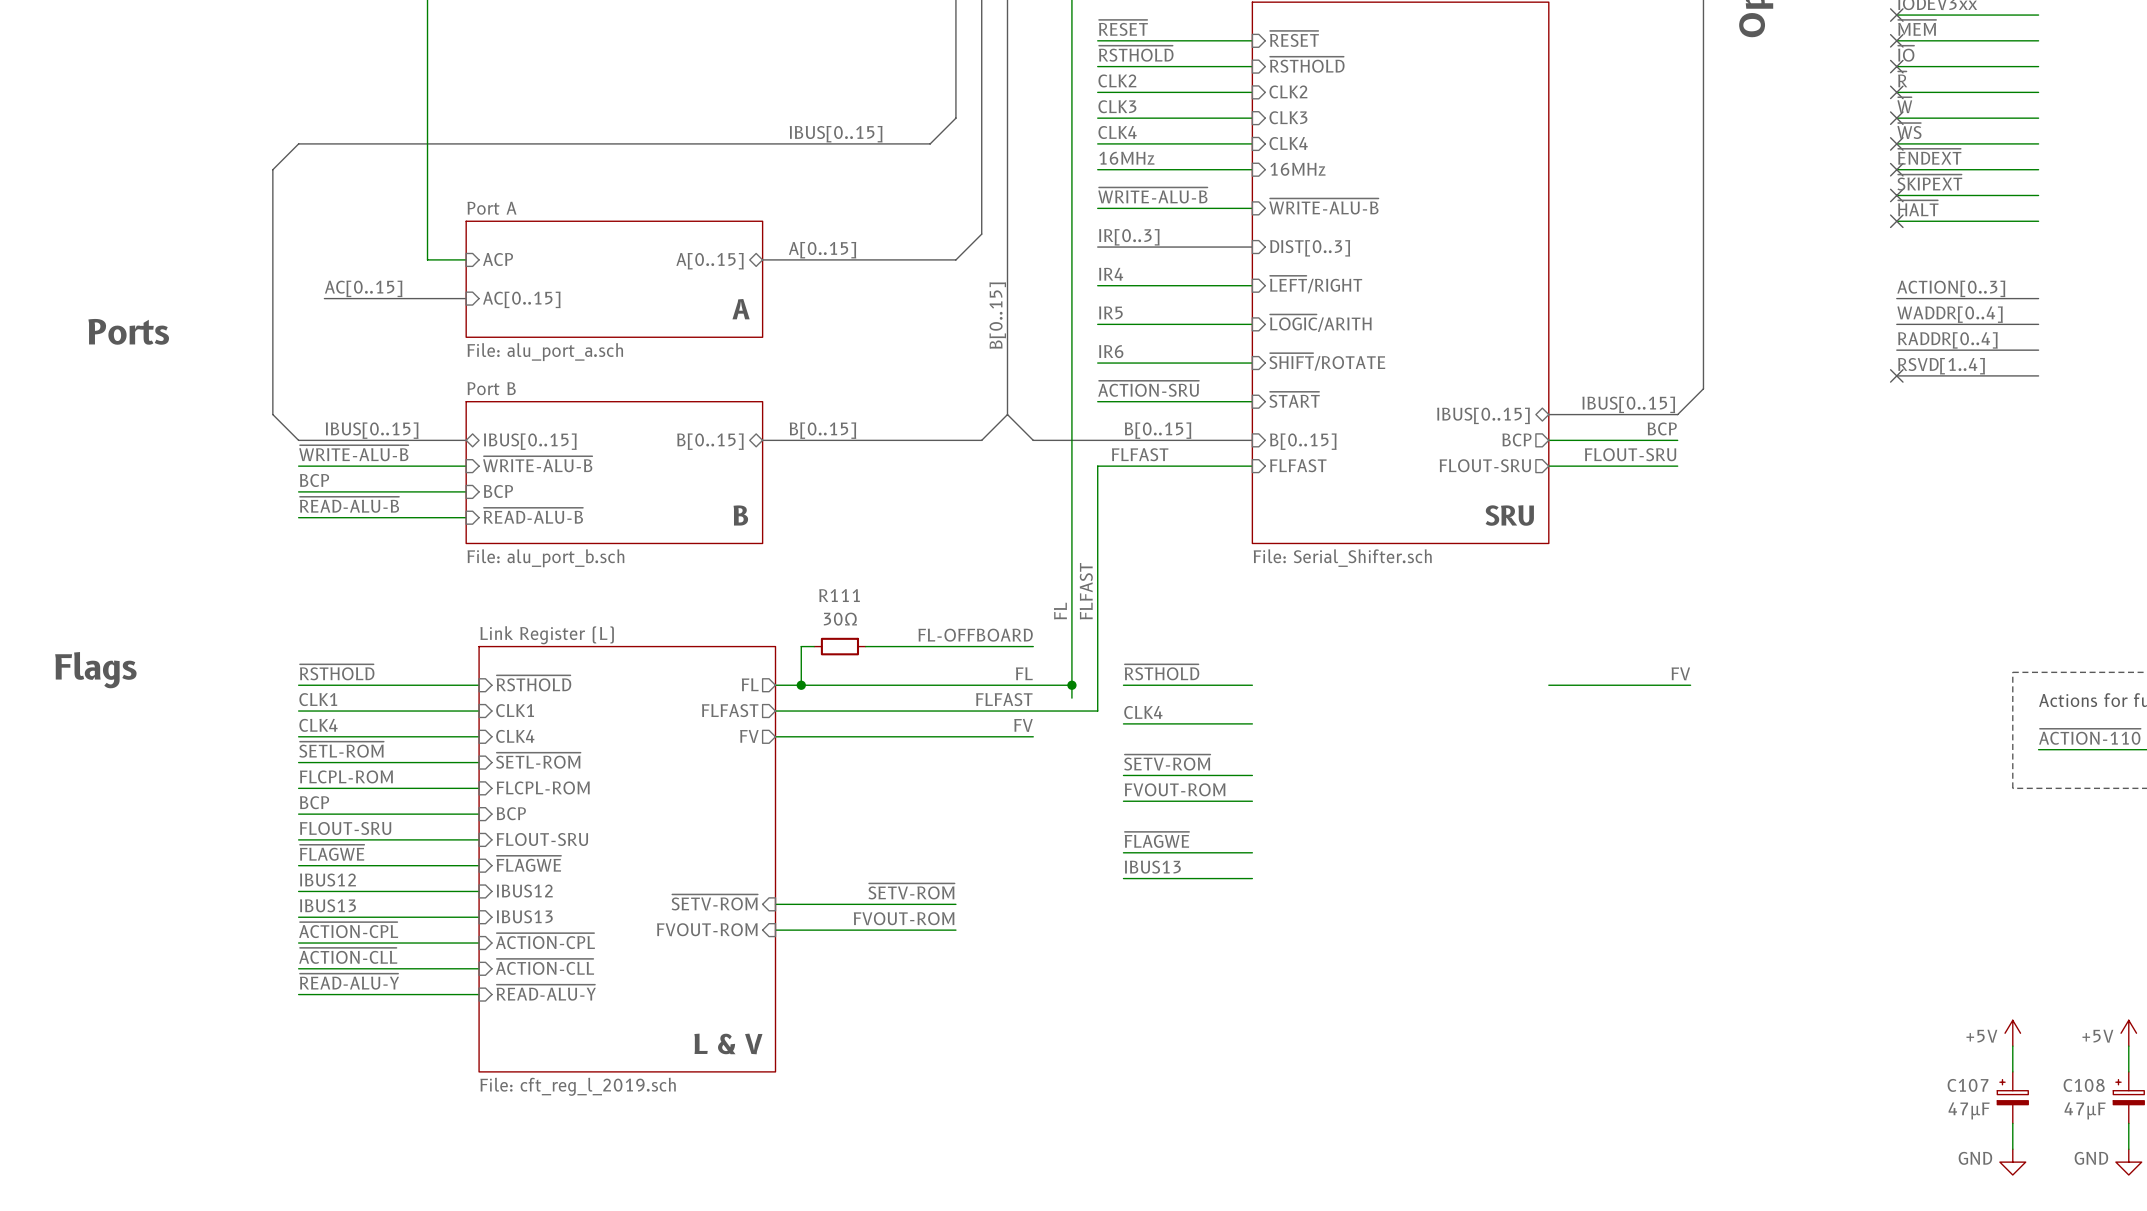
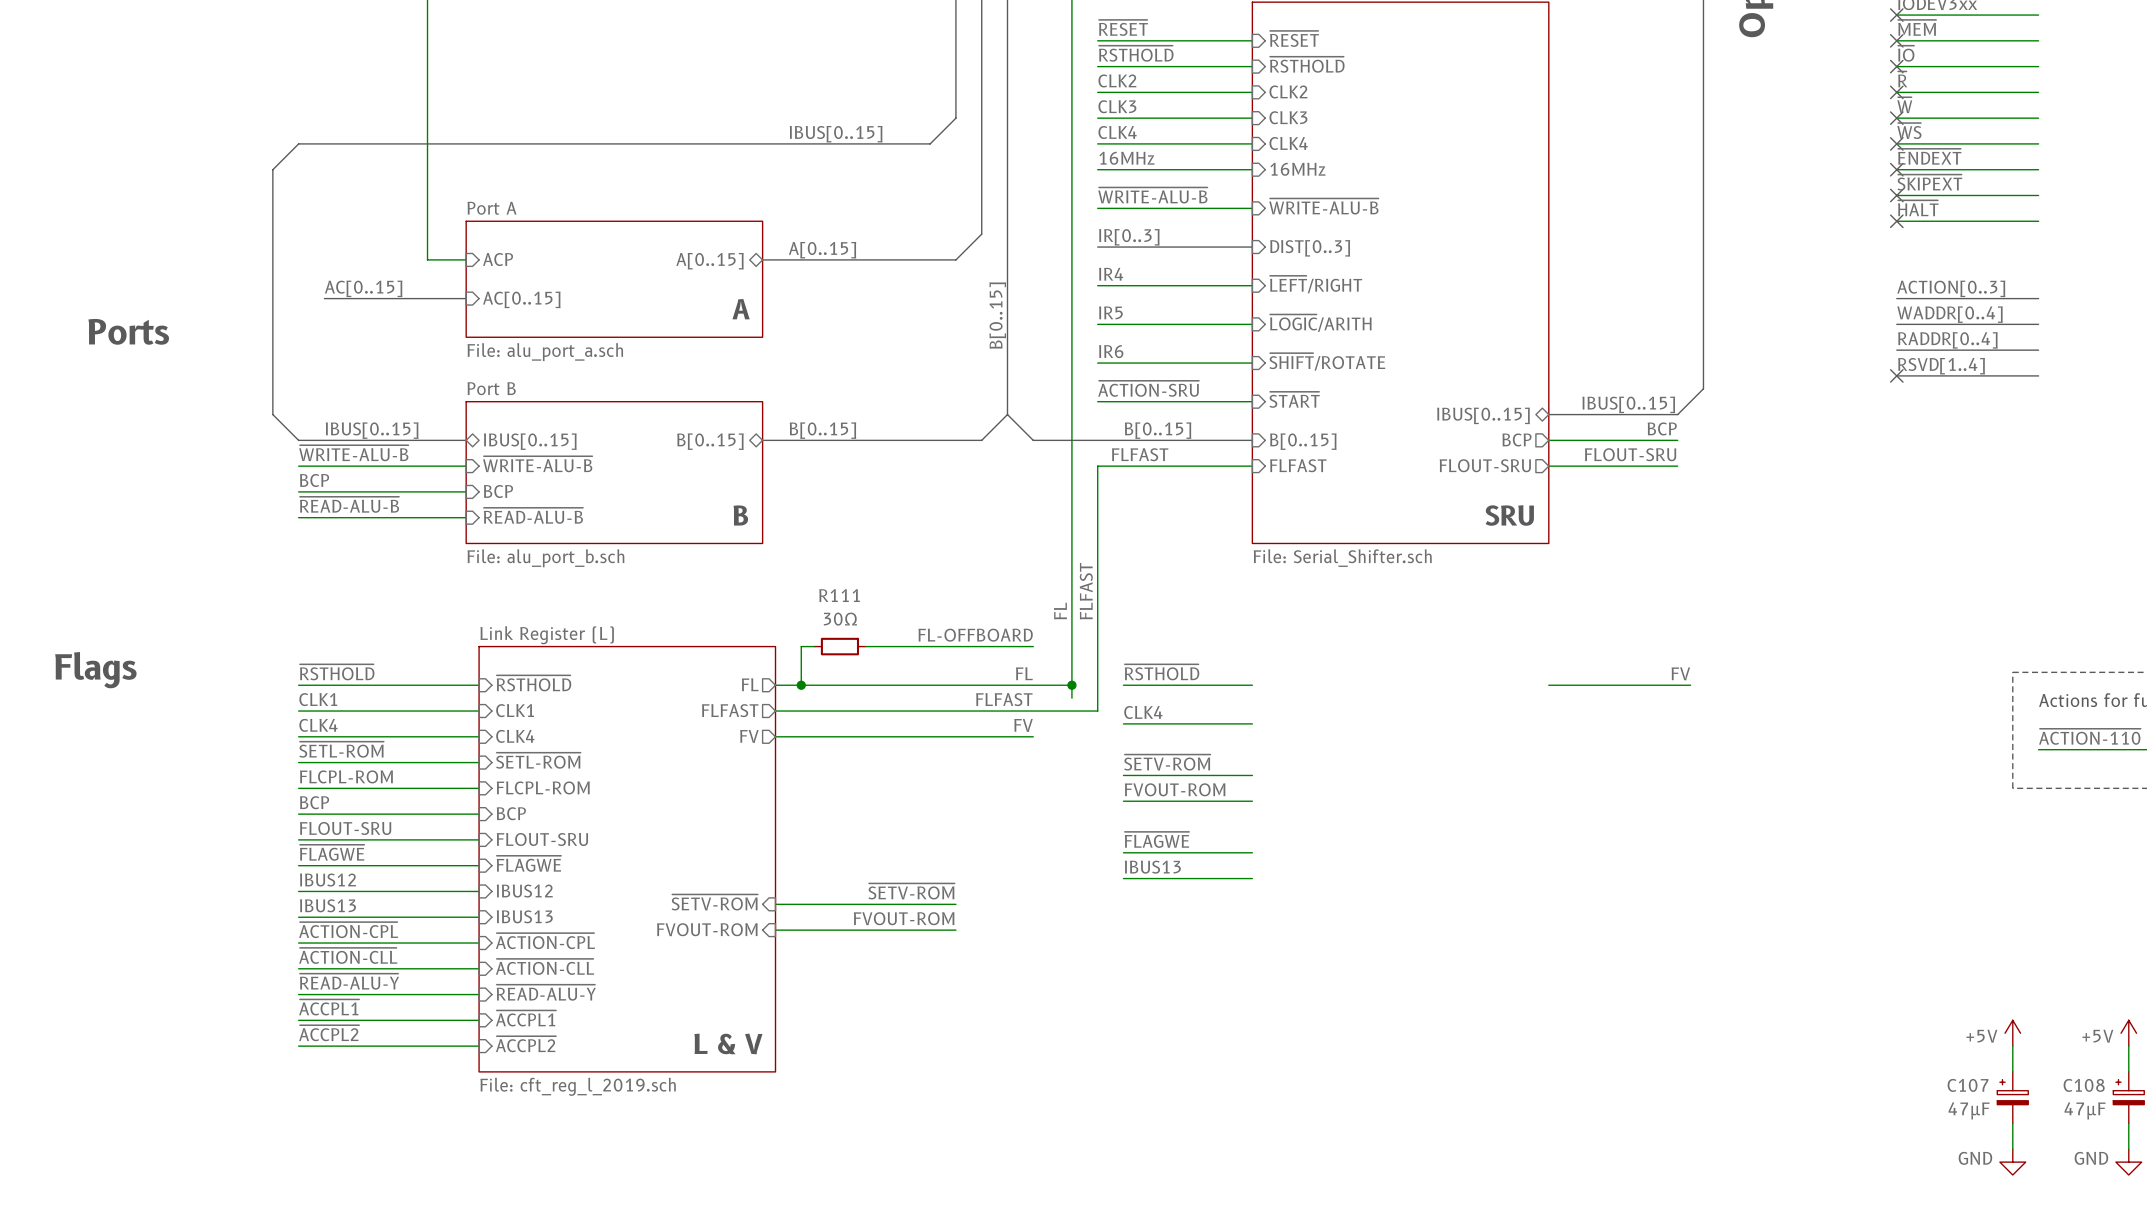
label: none -> ~{ACCPL1} (329, 1007)
sheet pin: none -> ~{ACCPL1} (526, 1018)
wire: none -> (298, 1020) (479, 1020)
label: none -> ~{ACCPL2} (329, 1033)
sheet pin: none -> ~{ACCPL2} (526, 1044)
wire: none -> (298, 1046) (479, 1046)

